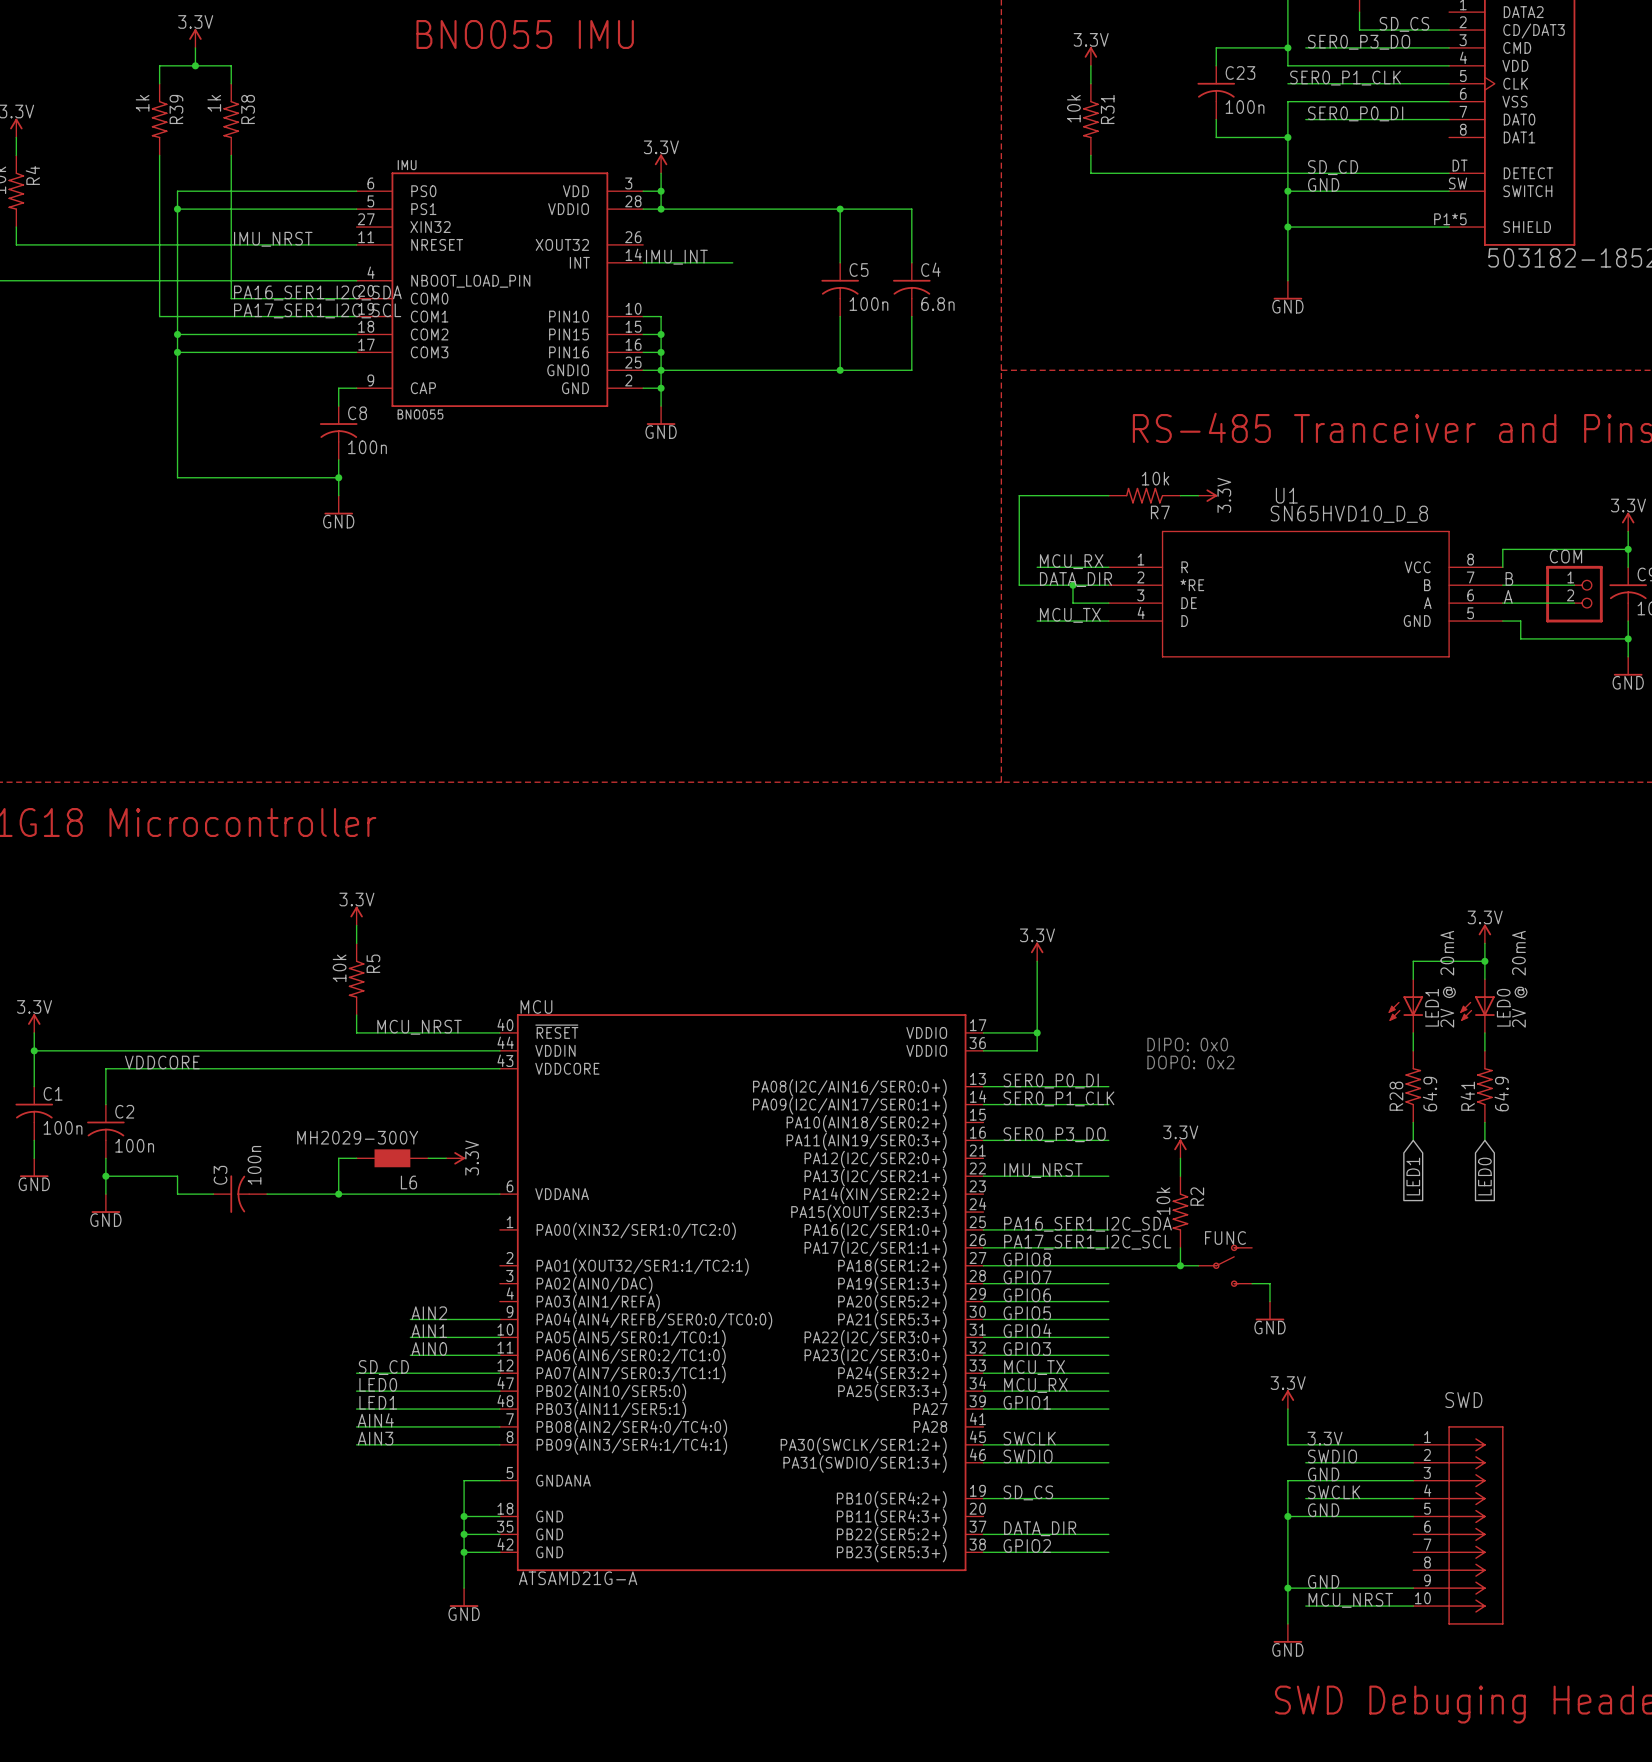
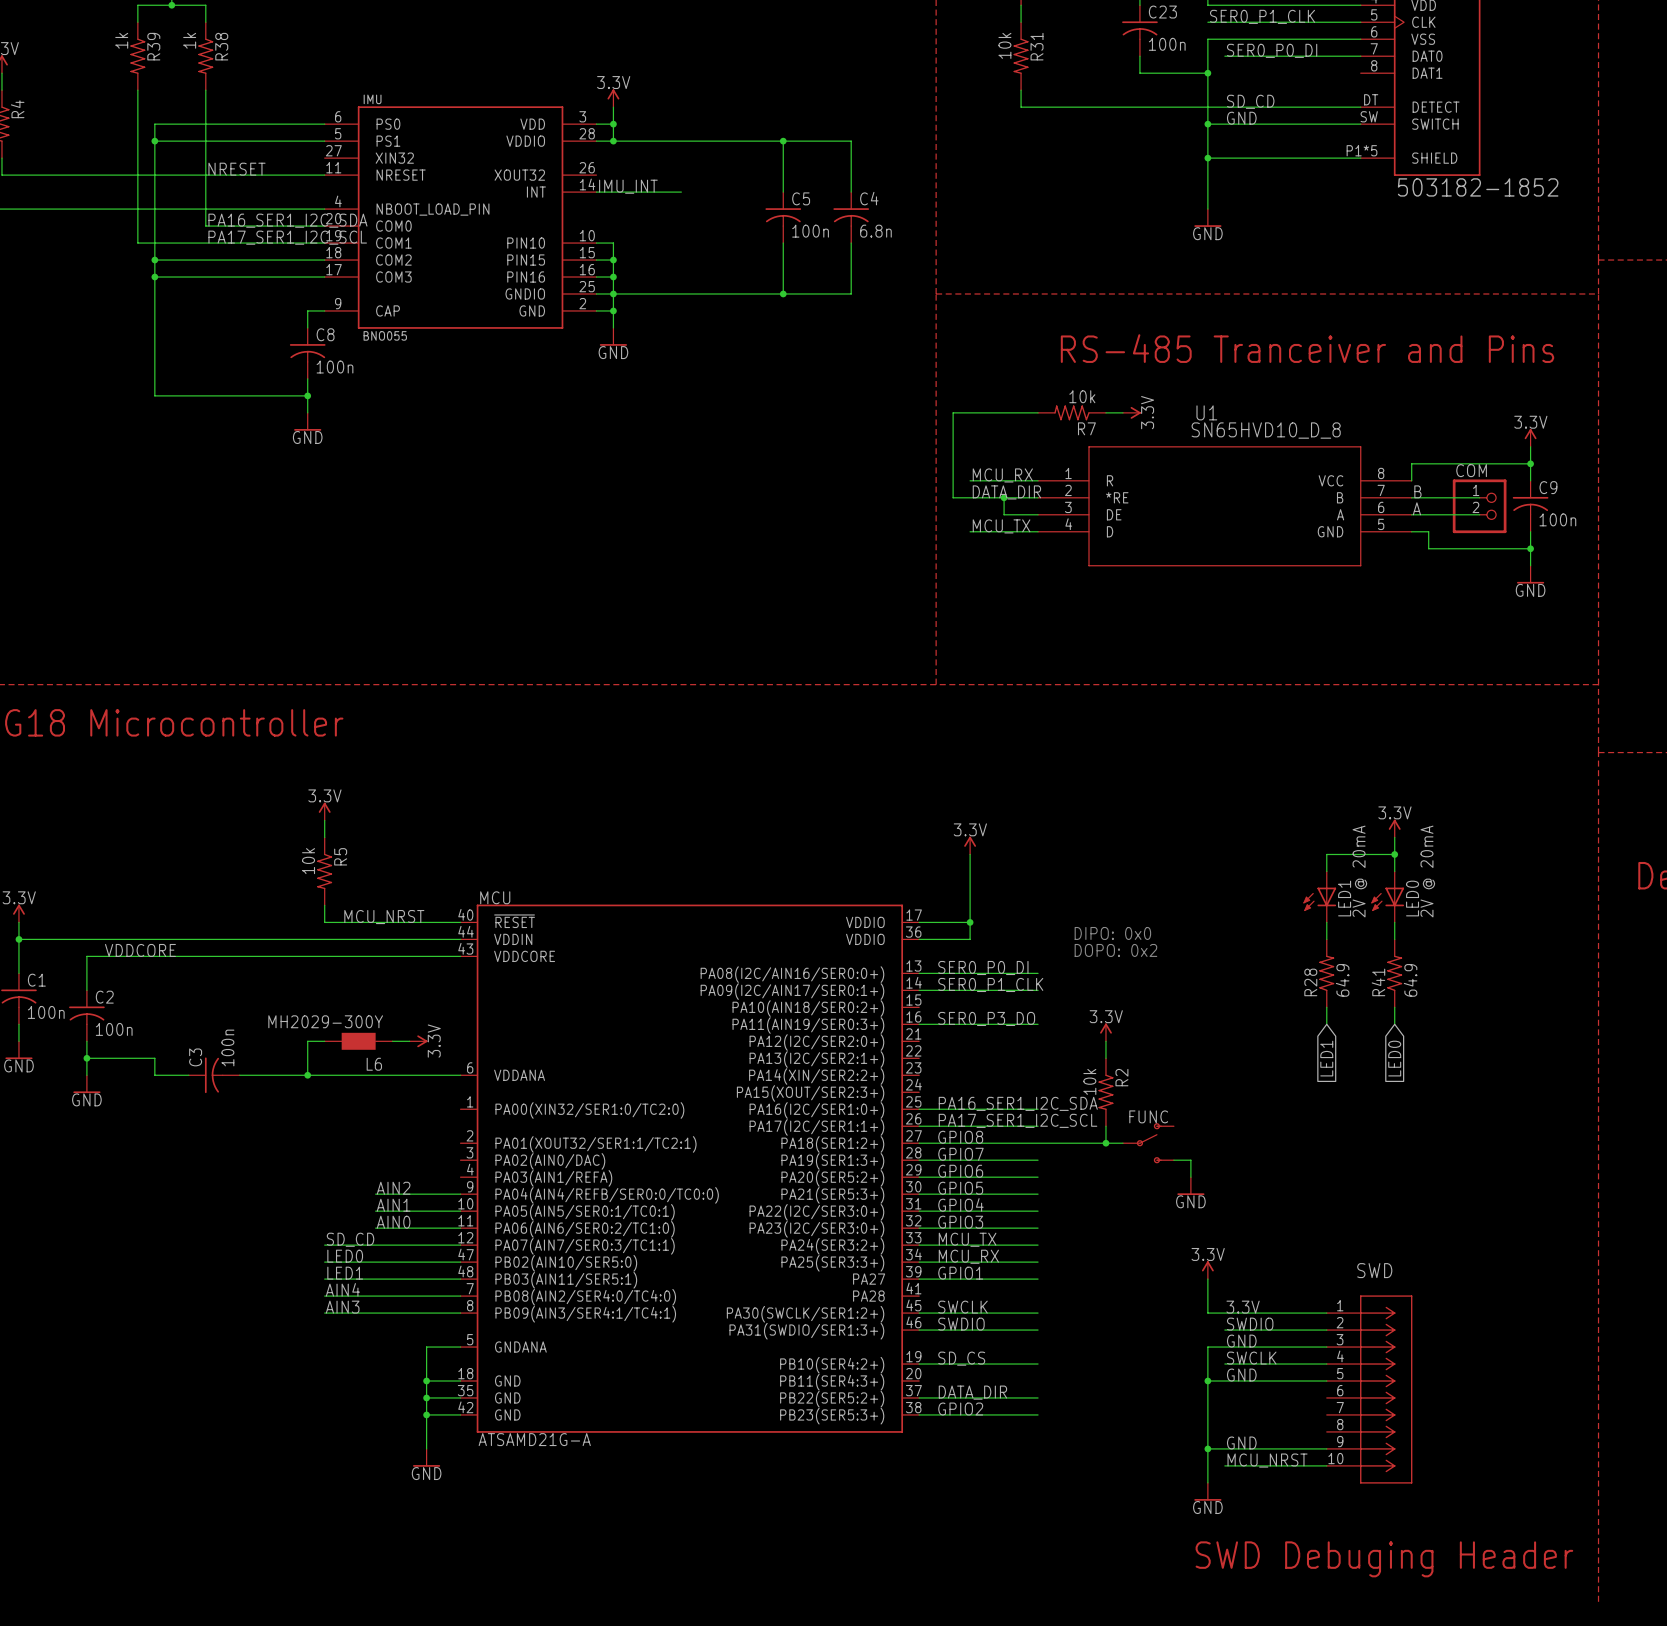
label: IMU_NRST (273, 239) -> NRESET (236, 169)
label: IMU_NRST (1043, 1170) -> none
wire: (983, 1176) (1108, 1176) -> none

